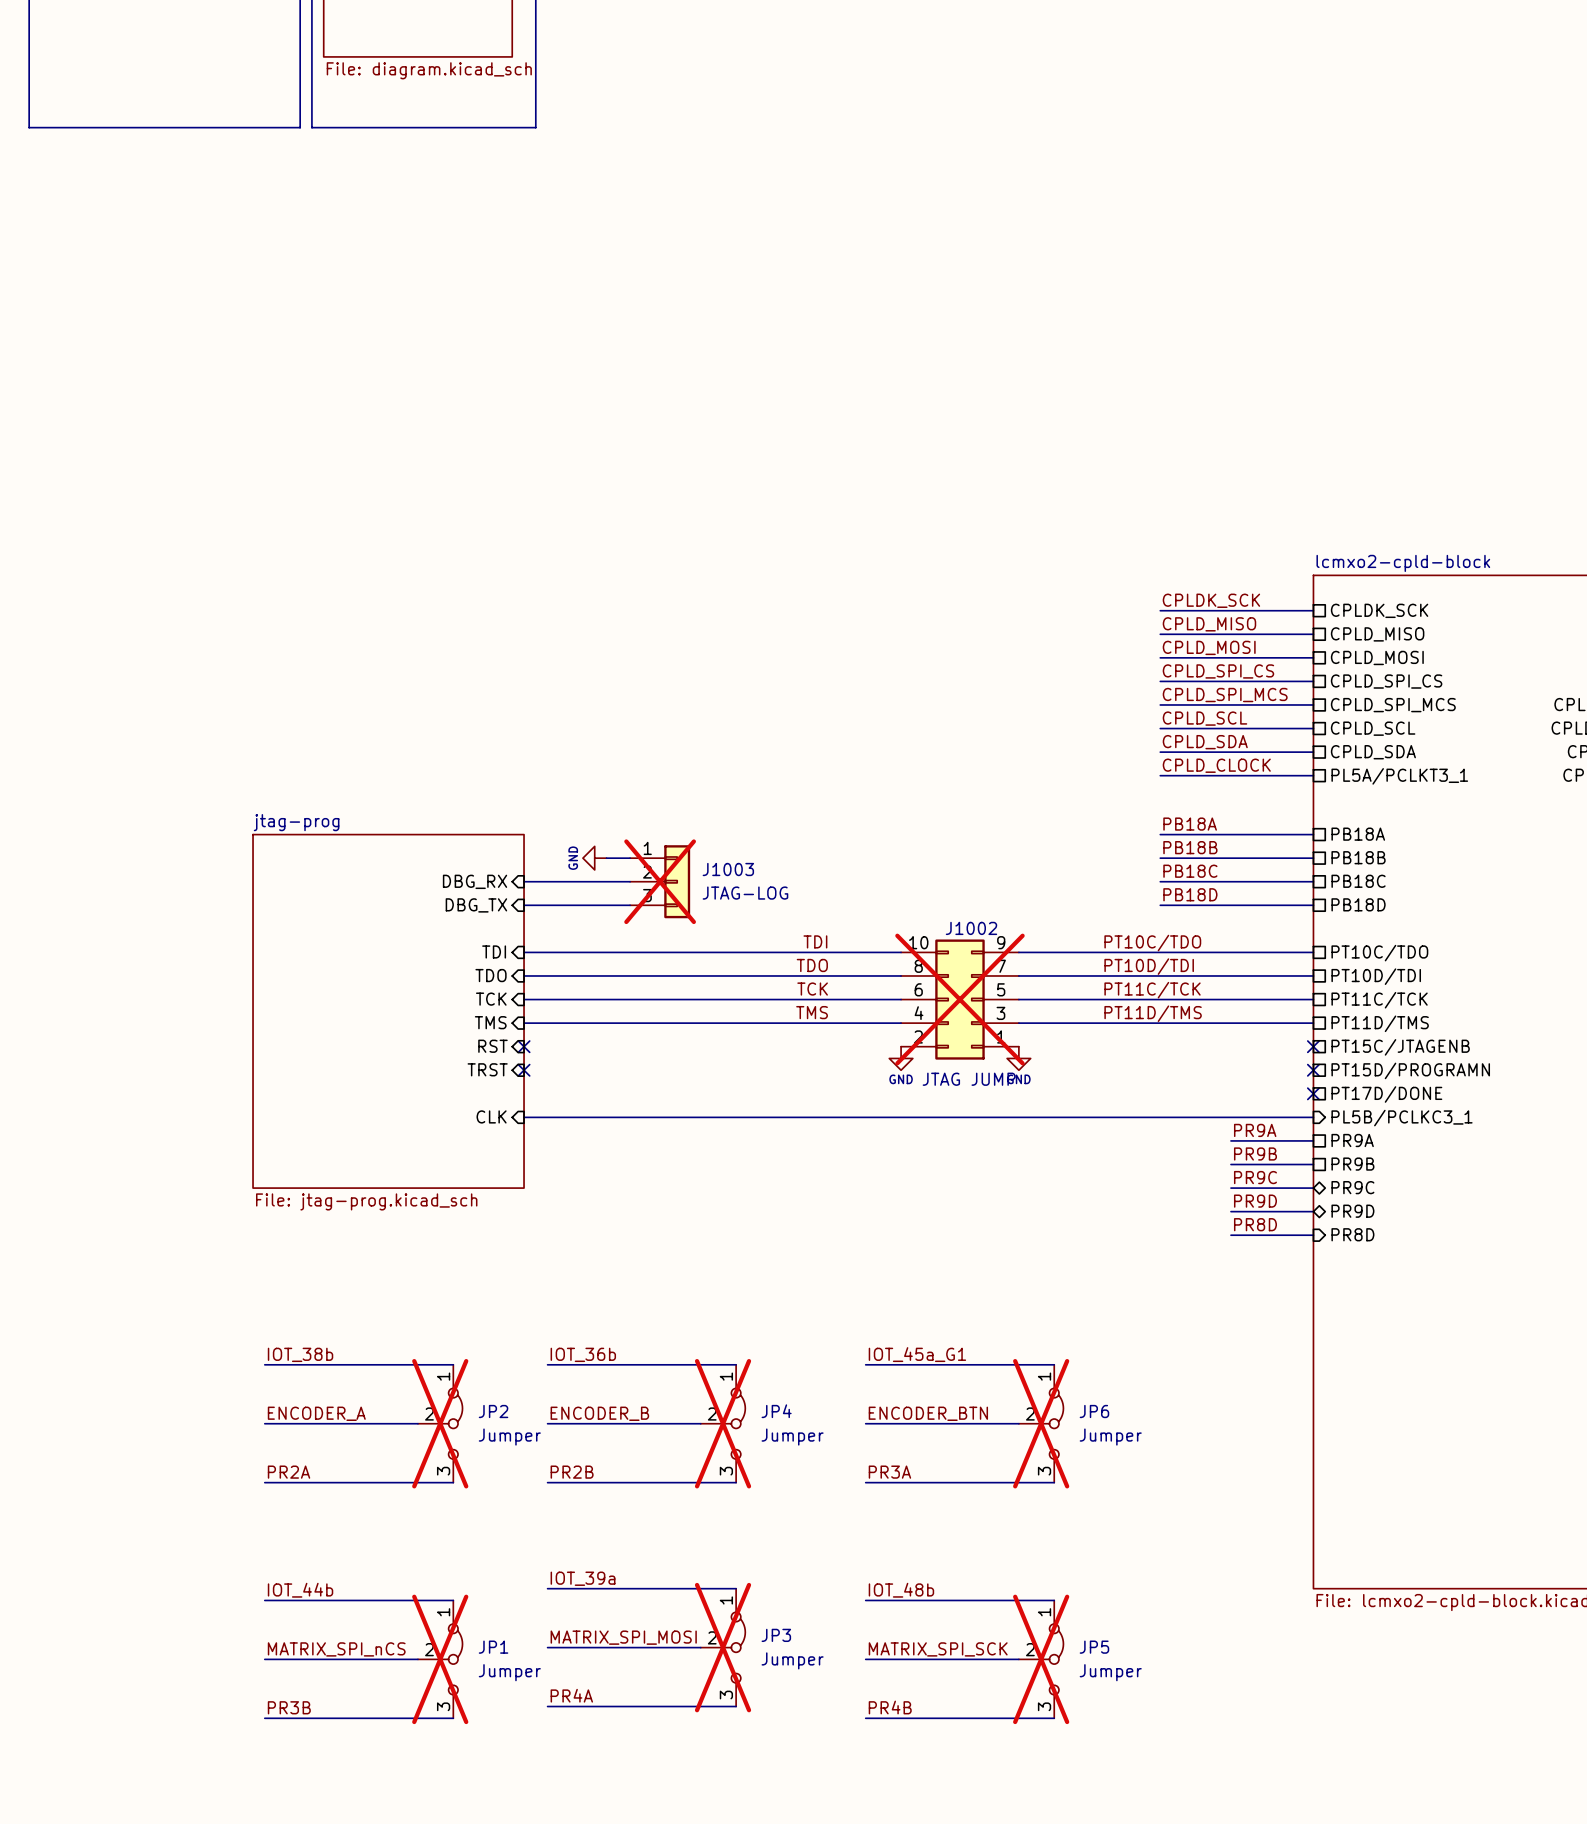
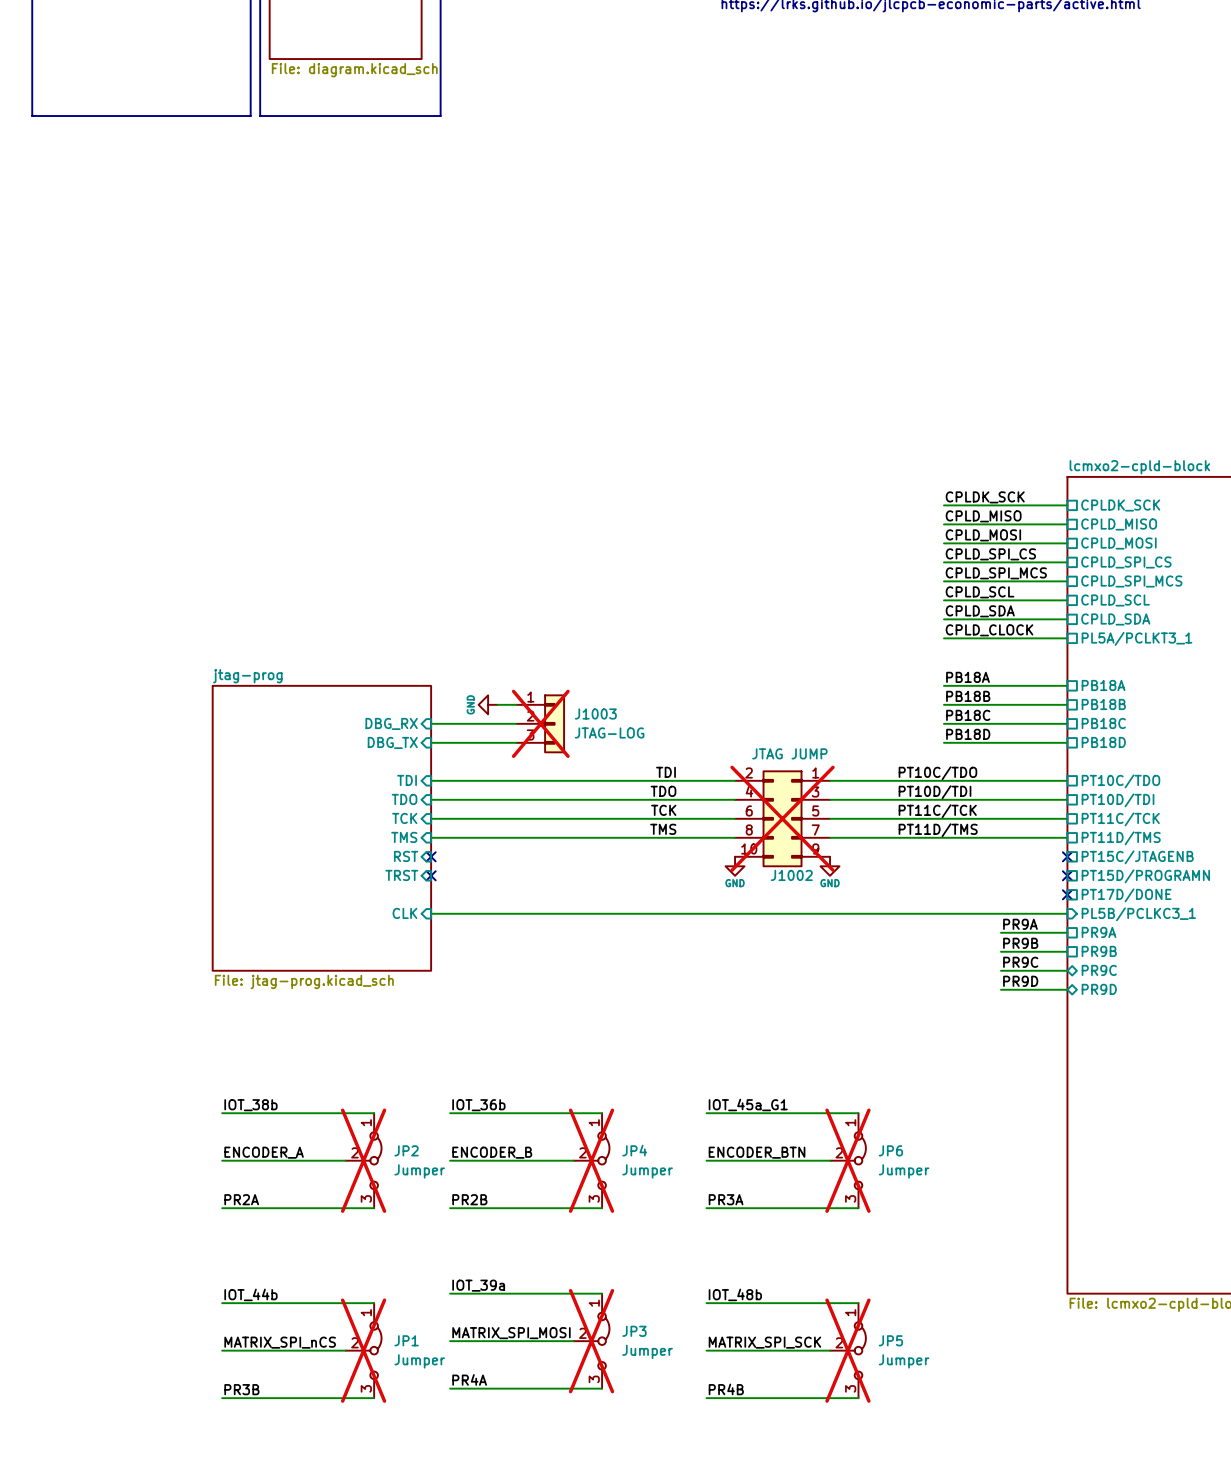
J1002 flip: as is (959, 999) -> up-down (782, 818)
label: PR8D (1255, 1224) -> none
sheet pin: PR8D (1352, 1234) -> none
wire: (1230, 1235) (1313, 1235) -> none

